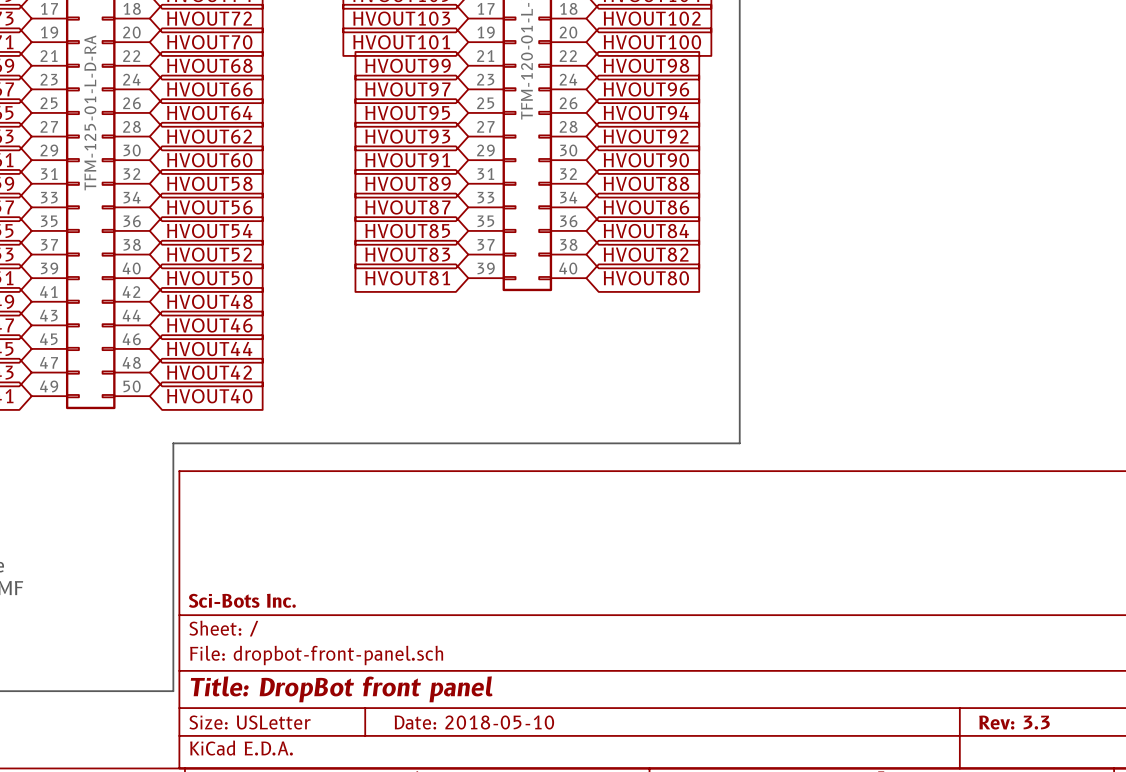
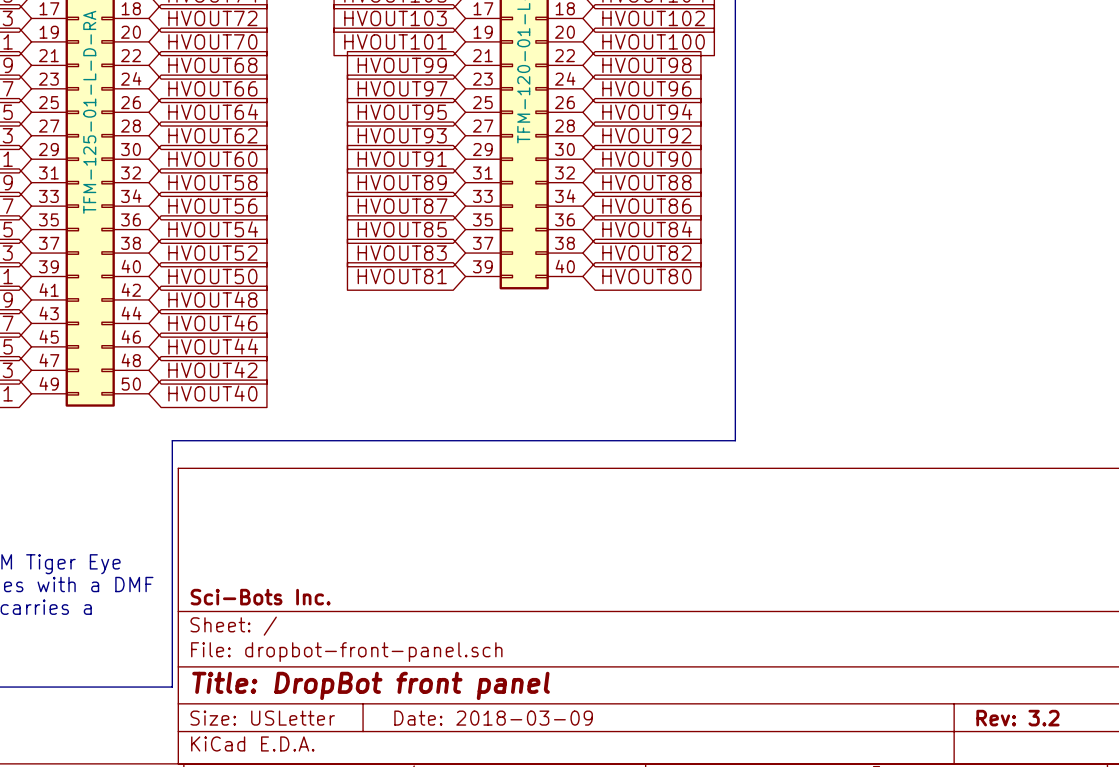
title block: Date: 2018-05-10 (474, 722) -> Date: 2018-03-09 (493, 718)
title block: Rev: 3.3 (1014, 722) -> Rev: 3.2 (1017, 718)

